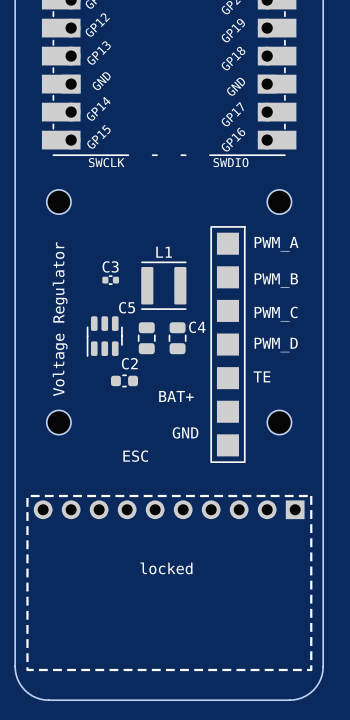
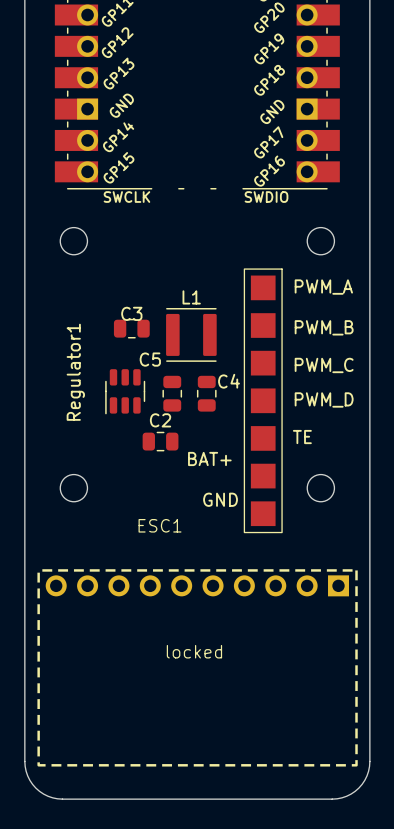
C3 footprint: [102, 275, 120, 285] -> [113, 318, 150, 339]
Voltage Regulator name: Voltage Regulator (60, 319) -> Regulator1 (75, 372)
C2 footprint: [110, 374, 139, 388] -> [142, 431, 179, 452]
ESC name: ESC (135, 456) -> ESC1 (160, 525)

